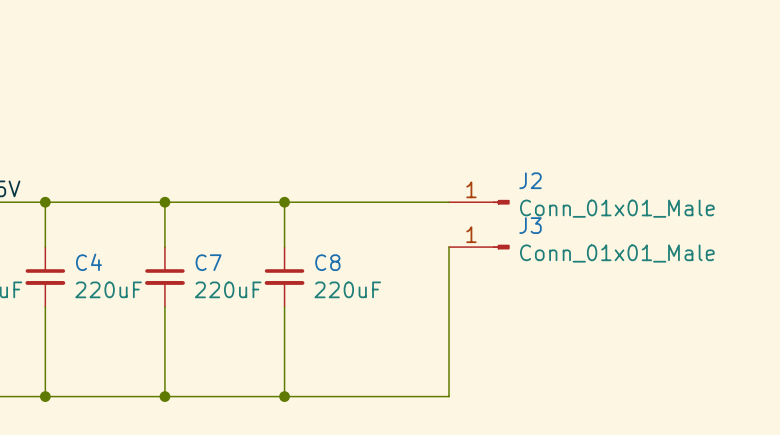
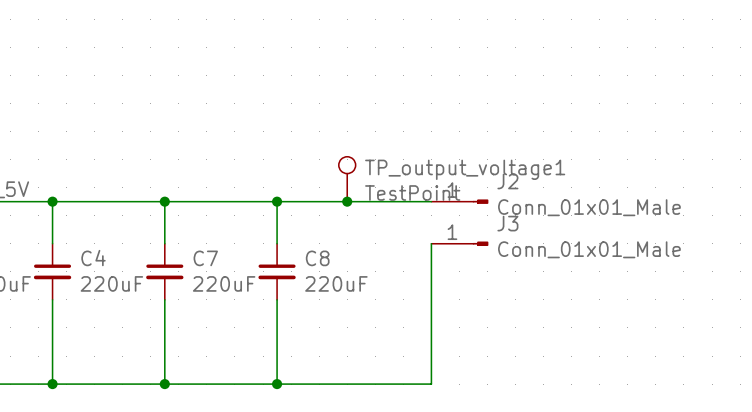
TP_output_voltage1: none -> TestPoint (347, 179)
junction: none -> (347, 201)

